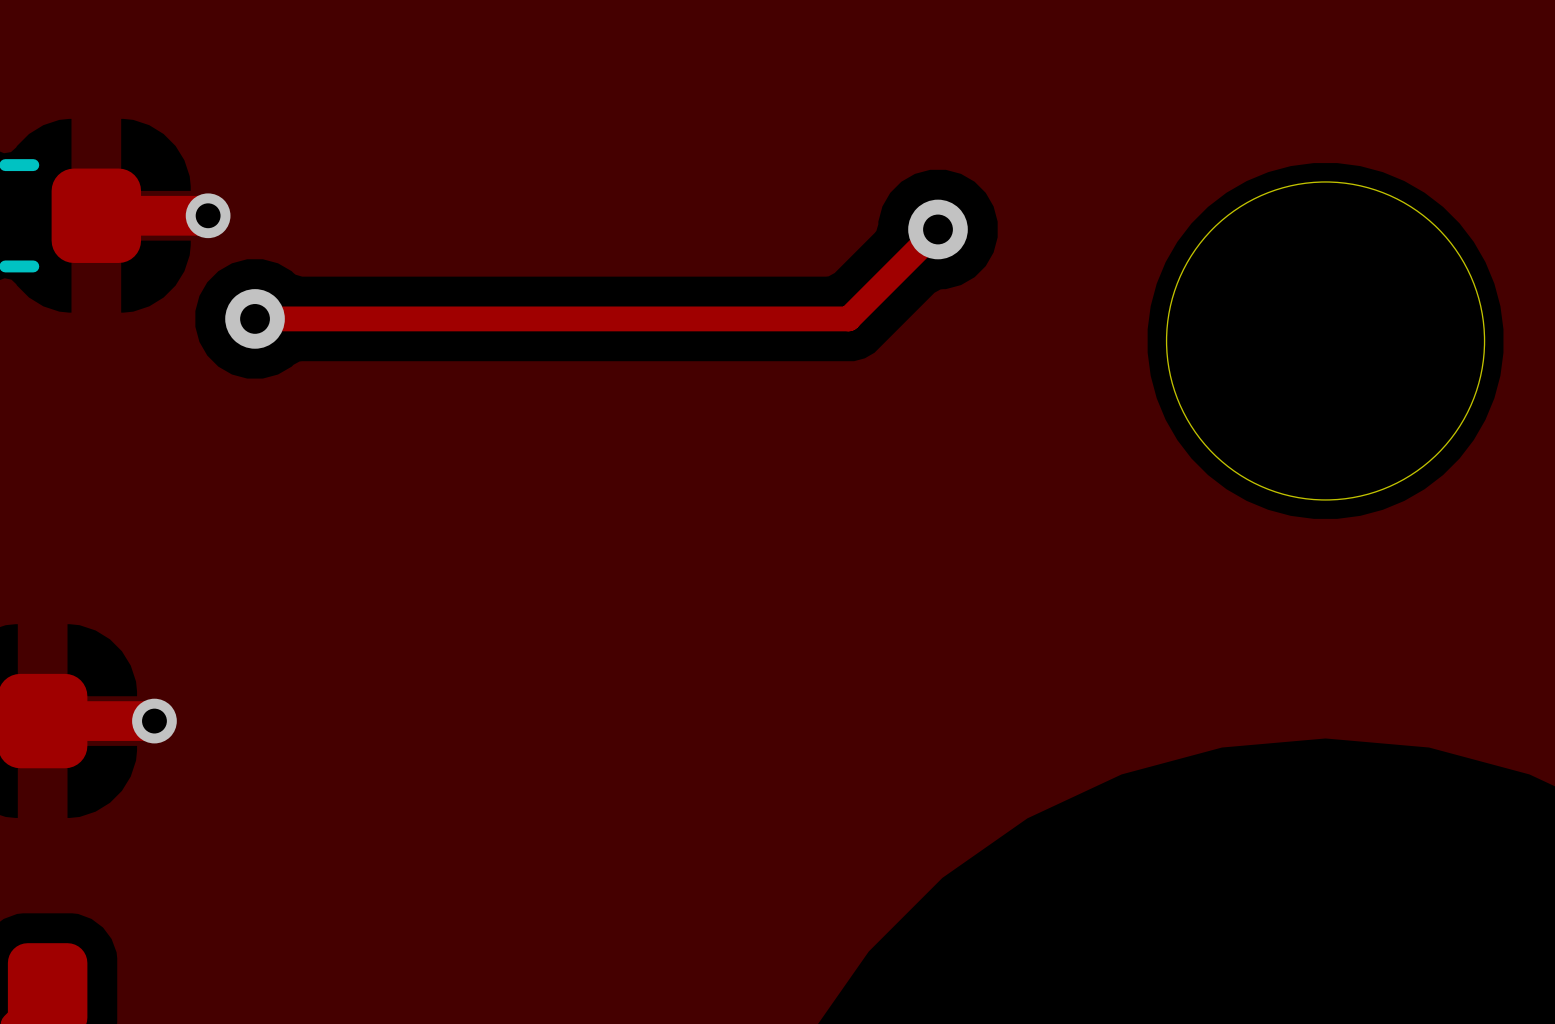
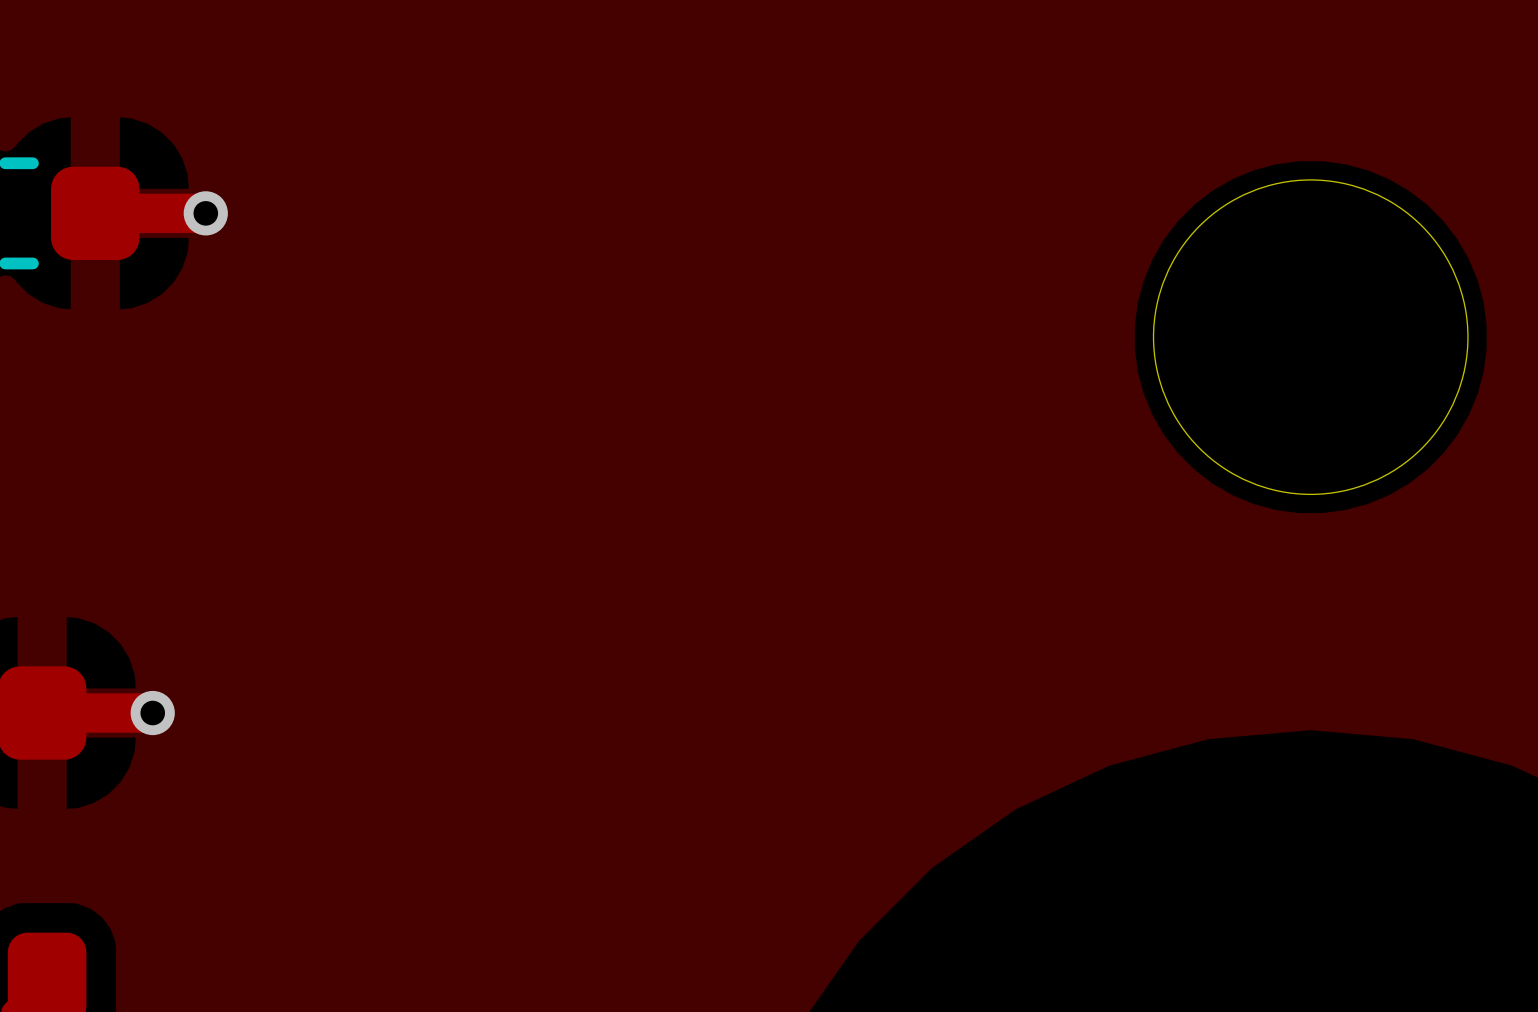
track: (938, 229) (848, 318) (255, 318) -> none
via: (938, 229) -> none
via: (255, 318) -> none

